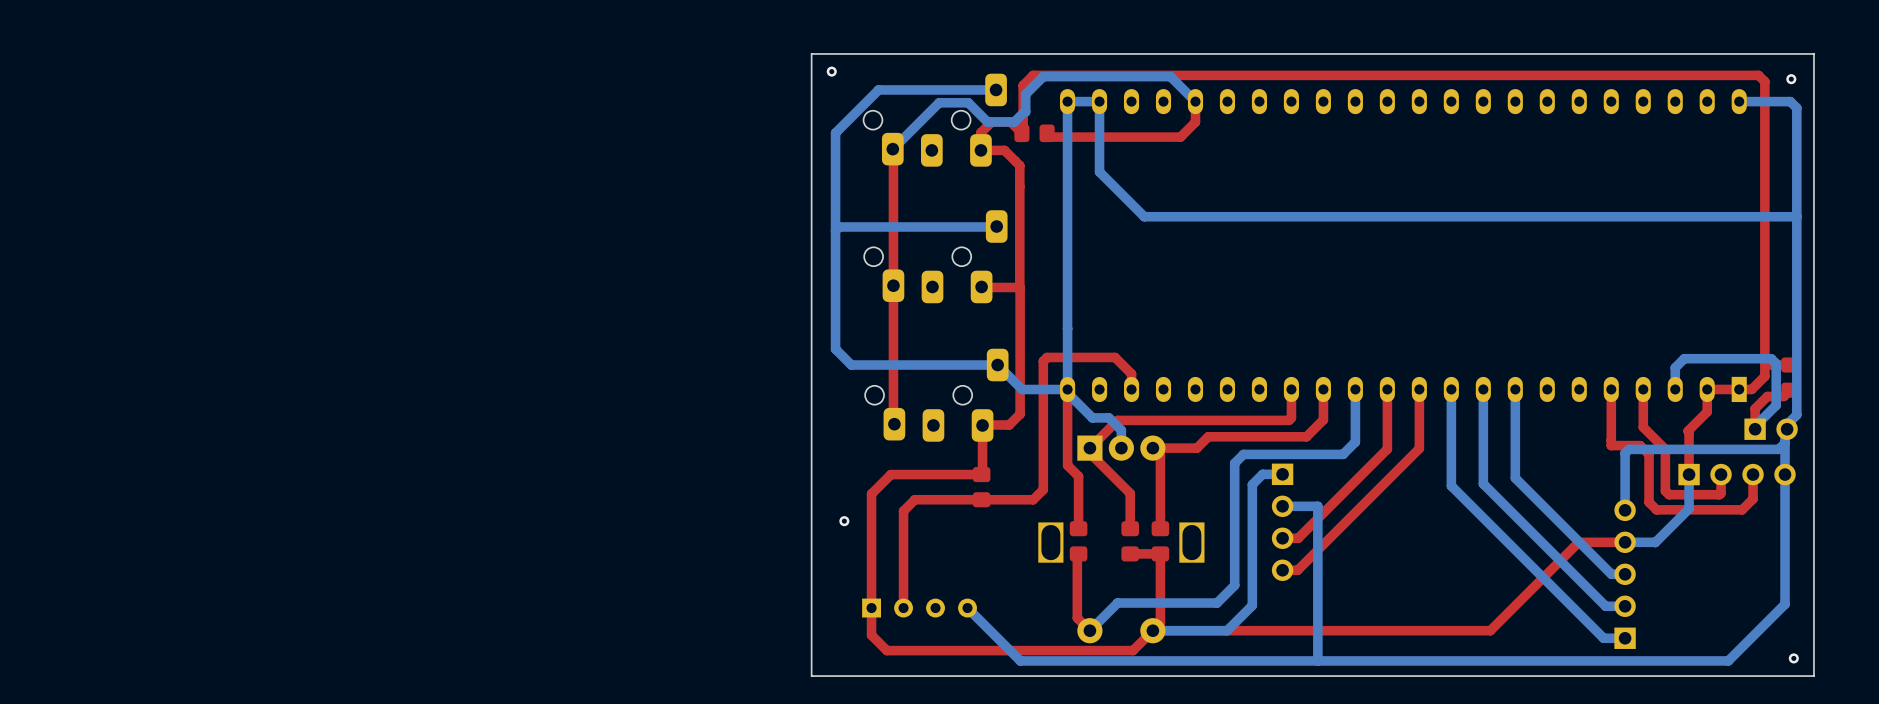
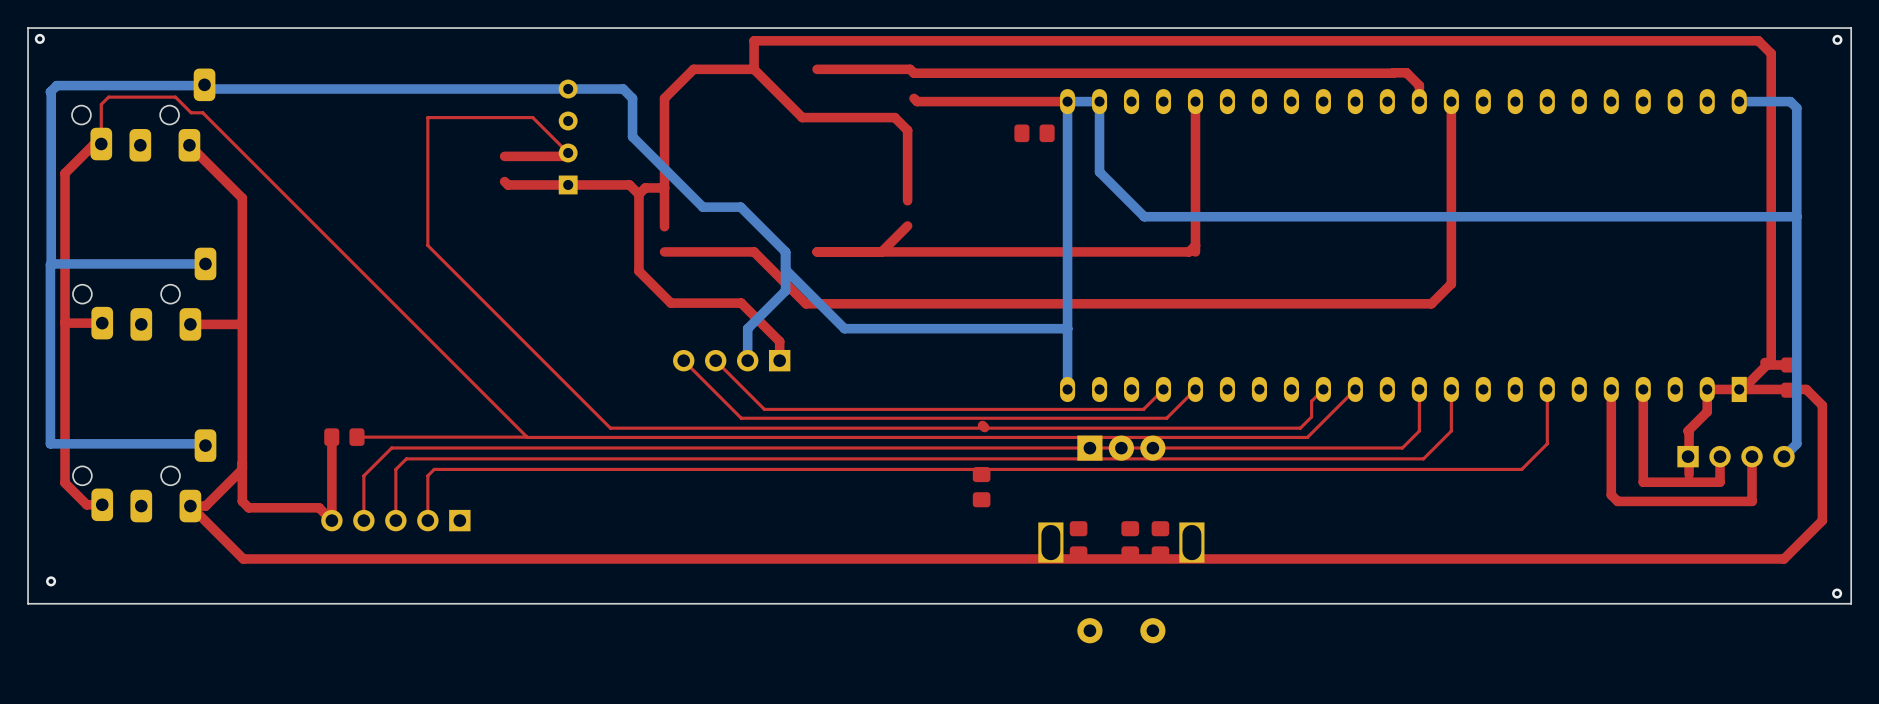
board edge: none -> (1851, 28) (28, 28) (28, 603) (1851, 603) (1851, 28)
via: none -> (39, 38)
board edge: (1813, 53) (811, 53) (811, 676) (1813, 676) (1813, 53) -> none
top track: none -> (754, 69) (693, 69) (664, 98) (664, 226)
top track: none -> (754, 69) (754, 40) (1758, 40) (1771, 53) (1771, 360) (1742, 389)
top track: none -> (754, 69) (802, 117) (894, 117) (907, 130) (907, 200)
top track: none -> (817, 69) (910, 69) (914, 73) (1406, 72) (1419, 85) (1419, 101)
via: (831, 71) -> none
bottom track: (1043, 76) (1170, 76) (1195, 101) -> none
bottom track: (1043, 76) (1025, 94) (1025, 111) (1014, 121) (987, 121) (968, 102) (939, 102) (892, 149) -> none
via position: (1791, 79) -> (1837, 39)
bottom track: (996, 89) (878, 89) (835, 133) (835, 349) (851, 365) (997, 365) (1022, 389) (1067, 389) (1067, 393) (1092, 417) (1108, 417) (1121, 430) (1121, 448) -> none
top track: none -> (914, 98) (917, 101) (1067, 101)
top track: none -> (1451, 101) (1451, 283) (1431, 303) (805, 303) (754, 251) (664, 251)
part: none -> (143, 115)
part: (935, 120) -> none
top track: (1195, 122) (1180, 137) (1050, 137) (1047, 133) -> (1195, 122) (1195, 251)
part: none -> (568, 136)
top track: none -> (189, 145) (242, 198) (242, 501) (248, 507) (319, 507) (331, 520) (331, 438)
top track: (892, 149) (894, 424) -> none
top track: none -> (504, 181) (508, 184) (629, 184) (638, 194)
top track: none -> (664, 187) (645, 187) (638, 194)
top track: none -> (638, 194) (638, 271) (670, 303) (741, 303) (779, 341) (779, 360)
top track: none -> (907, 225) (881, 251)
bottom track: (996, 226) (839, 226) (835, 230) -> none
top track: none -> (1195, 245) (1189, 251) (817, 251)
part: (935, 256) -> none
bottom track: none -> (51, 263) (50, 443) (203, 443) (205, 445)
bottom track: none -> (51, 263) (50, 92) (56, 85) (204, 84) (208, 89) (623, 89) (632, 98) (632, 136) (702, 207) (740, 207) (785, 251) (785, 290) (747, 328) (747, 360)
bottom track: none -> (205, 263) (51, 263)
bottom track: none -> (785, 269) (844, 328) (1067, 328)
top track: (981, 286) (1020, 287) -> none
top track: (1020, 287) (1019, 165) (1004, 150) (980, 150) (980, 132) (991, 121) (1010, 121) (1021, 133) (1023, 132) (1023, 85) (1033, 75) (1758, 75) (1764, 81) (1764, 376) (1751, 389) -> (242, 469) (205, 506) (190, 506) (243, 558) (1784, 558) (1822, 520) (1822, 405) (1806, 389) (1751, 389)
top track: (1020, 287) (1020, 414) (1009, 425) (982, 425) (982, 473) (890, 474) (871, 493) (871, 635) (886, 650) (1132, 650) (1160, 623) (1160, 553) (1130, 553) -> none
part: none -> (144, 294)
top track: none -> (65, 322) (102, 323)
top track: none -> (242, 322) (240, 324) (190, 324)
top track: none -> (683, 360) (741, 418) (1166, 418) (1195, 389)
top track: none -> (715, 360) (764, 409) (1143, 409) (1163, 389)
part: none -> (731, 360)
top track: (1067, 389) (1067, 465) (1078, 476) (1078, 528) -> none
top track: (1131, 389) (1131, 373) (1115, 357) (1047, 357) (1043, 361) (1043, 489) (1033, 499) (914, 499) (903, 511) (903, 608) -> none
top track: (1291, 389) (1291, 417) (1288, 420) (1117, 420) (1089, 448) (1089, 453) (1130, 493) (1130, 528) -> none
top track: (1323, 389) (1323, 419) (1306, 436) (1208, 436) (1196, 448) (1152, 448) (1160, 455) (1160, 528) -> (1323, 389) (1311, 401) (1311, 416) (1300, 428) (610, 428) (427, 245) (427, 117) (532, 117) (568, 152) (564, 156) (504, 156)
top track: none -> (1355, 389) (1307, 437) (527, 437) (202, 112) (191, 112) (175, 97) (108, 97) (101, 104) (101, 144) (94, 144) (65, 173) (65, 483) (86, 504) (102, 504)
bottom track: (1355, 389) (1355, 442) (1343, 454) (1243, 454) (1234, 463) (1234, 585) (1217, 603) (1117, 603) (1089, 630) -> none
top track: (1387, 389) (1387, 449) (1298, 538) (1282, 538) -> none
top track width: thick (1419, 389) (1419, 431) -> thin (1419, 389) (1419, 431)
top track: none -> (1451, 389) (1451, 431) (1423, 458) (406, 458) (395, 469) (395, 520)
bottom track: (1451, 389) (1451, 485) (1603, 638) (1625, 638) -> none
bottom track: (1483, 389) (1483, 483) (1605, 606) (1625, 606) -> none
bottom track: (1515, 389) (1515, 478) (1611, 574) (1625, 574) -> none
top track: none -> (1547, 389) (1547, 443) (1521, 469) (434, 469) (427, 475) (427, 520)
bottom track: (1675, 389) (1675, 367) (1684, 358) (1771, 358) (1776, 363) (1776, 405) (1755, 426) (1755, 429) -> none
top track: (1790, 390) (1783, 396) (1767, 396) (1755, 408) (1755, 429) -> none
part: (936, 395) -> none
bottom track: (1796, 414) (1787, 424) (1785, 431) (1785, 604) (1728, 660) (1020, 660) (967, 608) -> (1796, 414) (1796, 443) (1784, 456)
top track: (1643, 427) (1665, 449) (1665, 490) (1669, 494) (1719, 494) (1721, 474) -> (1643, 427) (1643, 482) (1720, 482) (1720, 456)
part: (1771, 429) -> none
top track: (1419, 431) (1419, 448) (1297, 570) (1282, 570) -> (1419, 431) (1402, 447) (391, 447) (363, 475) (363, 520)
part: none -> (344, 437)
top track: none -> (527, 437) (356, 437)
bottom track: (1785, 443) (1778, 449) (1628, 449) (1625, 453) (1625, 510) -> none
top track: (1611, 445) (1640, 445) (1649, 454) (1649, 502) (1656, 509) (1742, 509) (1753, 498) (1753, 474) -> (1611, 445) (1611, 495) (1617, 501) (1752, 501) (1752, 456)
bottom track: (1282, 474) (1262, 474) (1252, 484) (1252, 605) (1227, 630) (1152, 630) -> none
bottom track: (1689, 474) (1689, 508) (1655, 542) (1625, 542) -> none
part position: (1737, 474) -> (1736, 456)
part: none -> (144, 475)
bottom track: (1282, 506) (1317, 506) (1317, 660) -> none
part: none -> (395, 520)
via: (844, 521) -> none
part: (1282, 522) -> none
top track: (1625, 542) (1578, 542) (1490, 630) (1152, 630) -> none
top track: (1078, 553) (1077, 618) (1089, 630) -> none
part: (1625, 574) -> none
via: none -> (51, 581)
via: none -> (1837, 593)
part: (919, 608) -> none
via: (1793, 658) -> none

